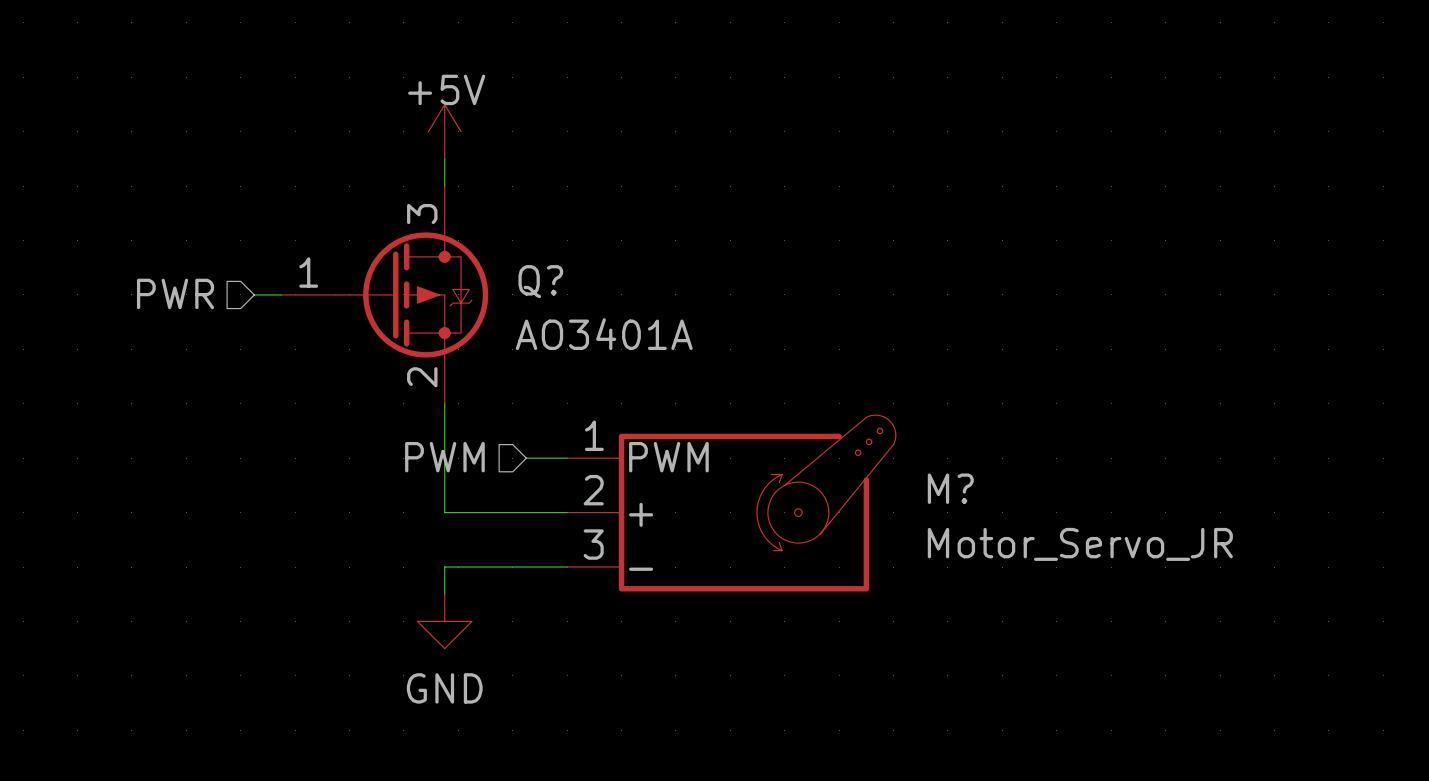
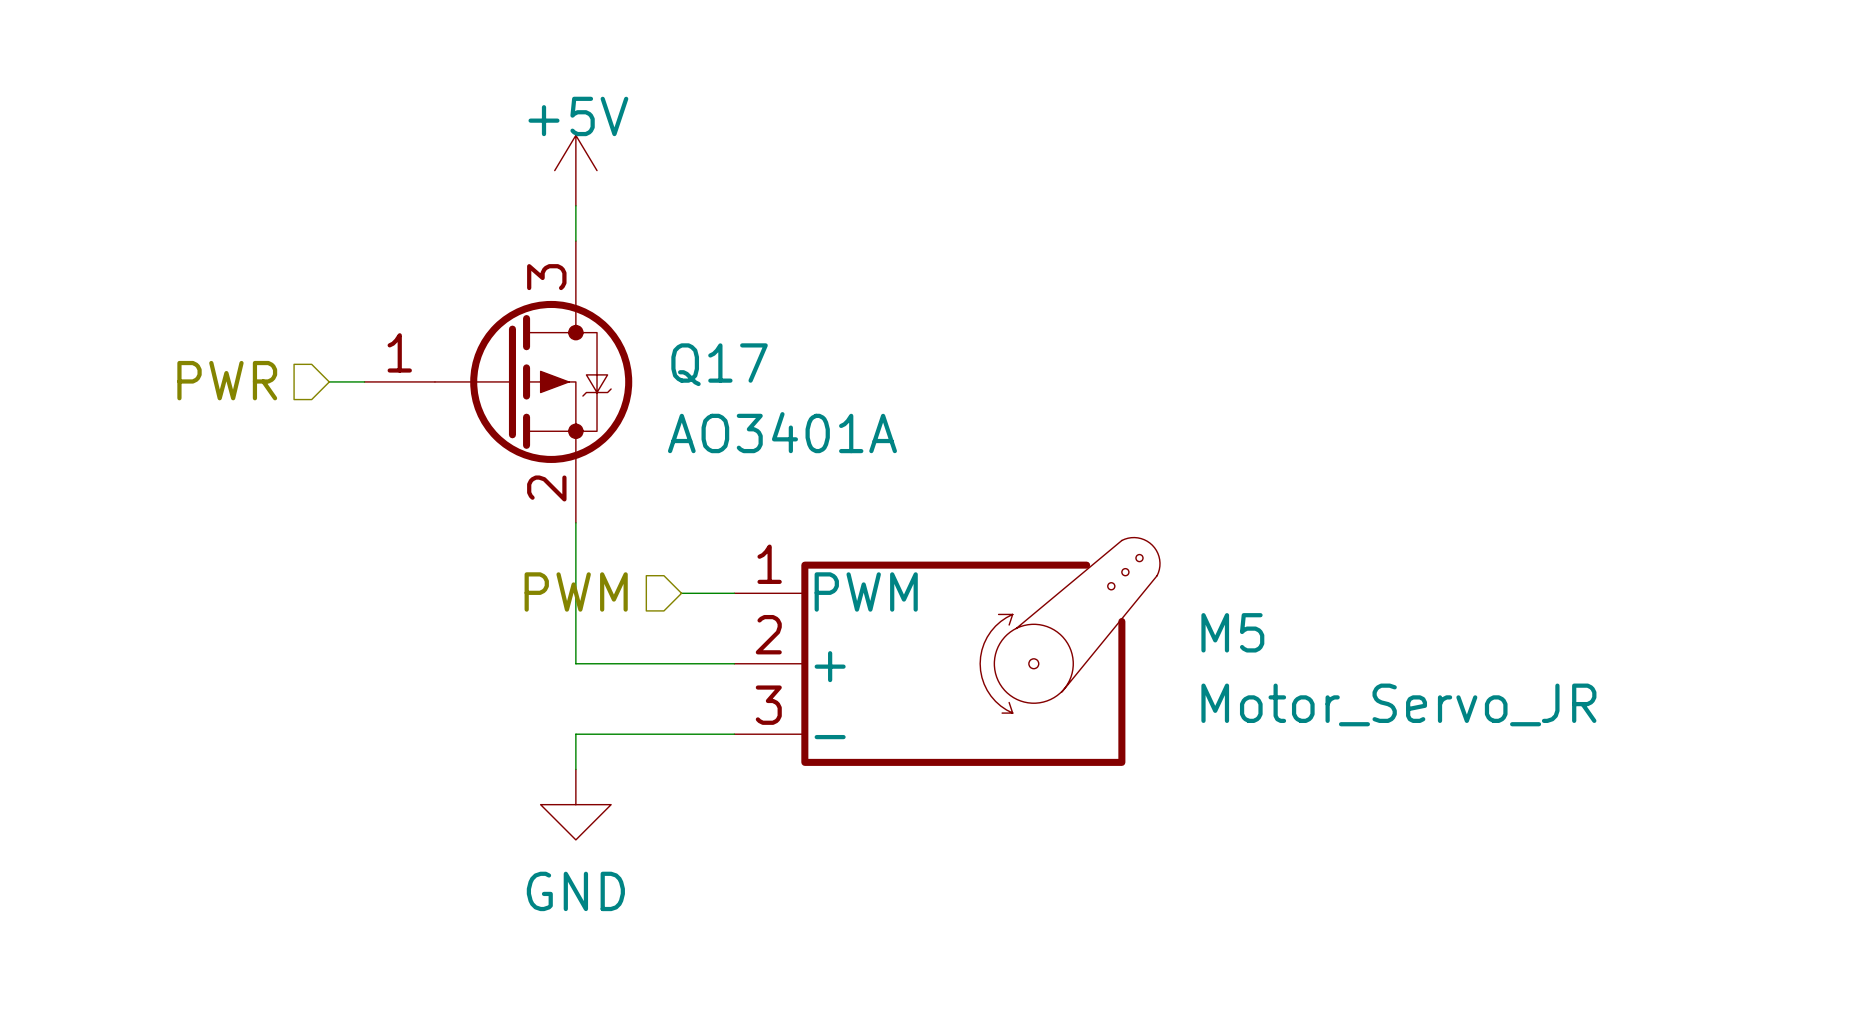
Q? name: Q? (540, 281) -> Q17 (719, 364)
M? name: M? (950, 488) -> M5 (1232, 632)

